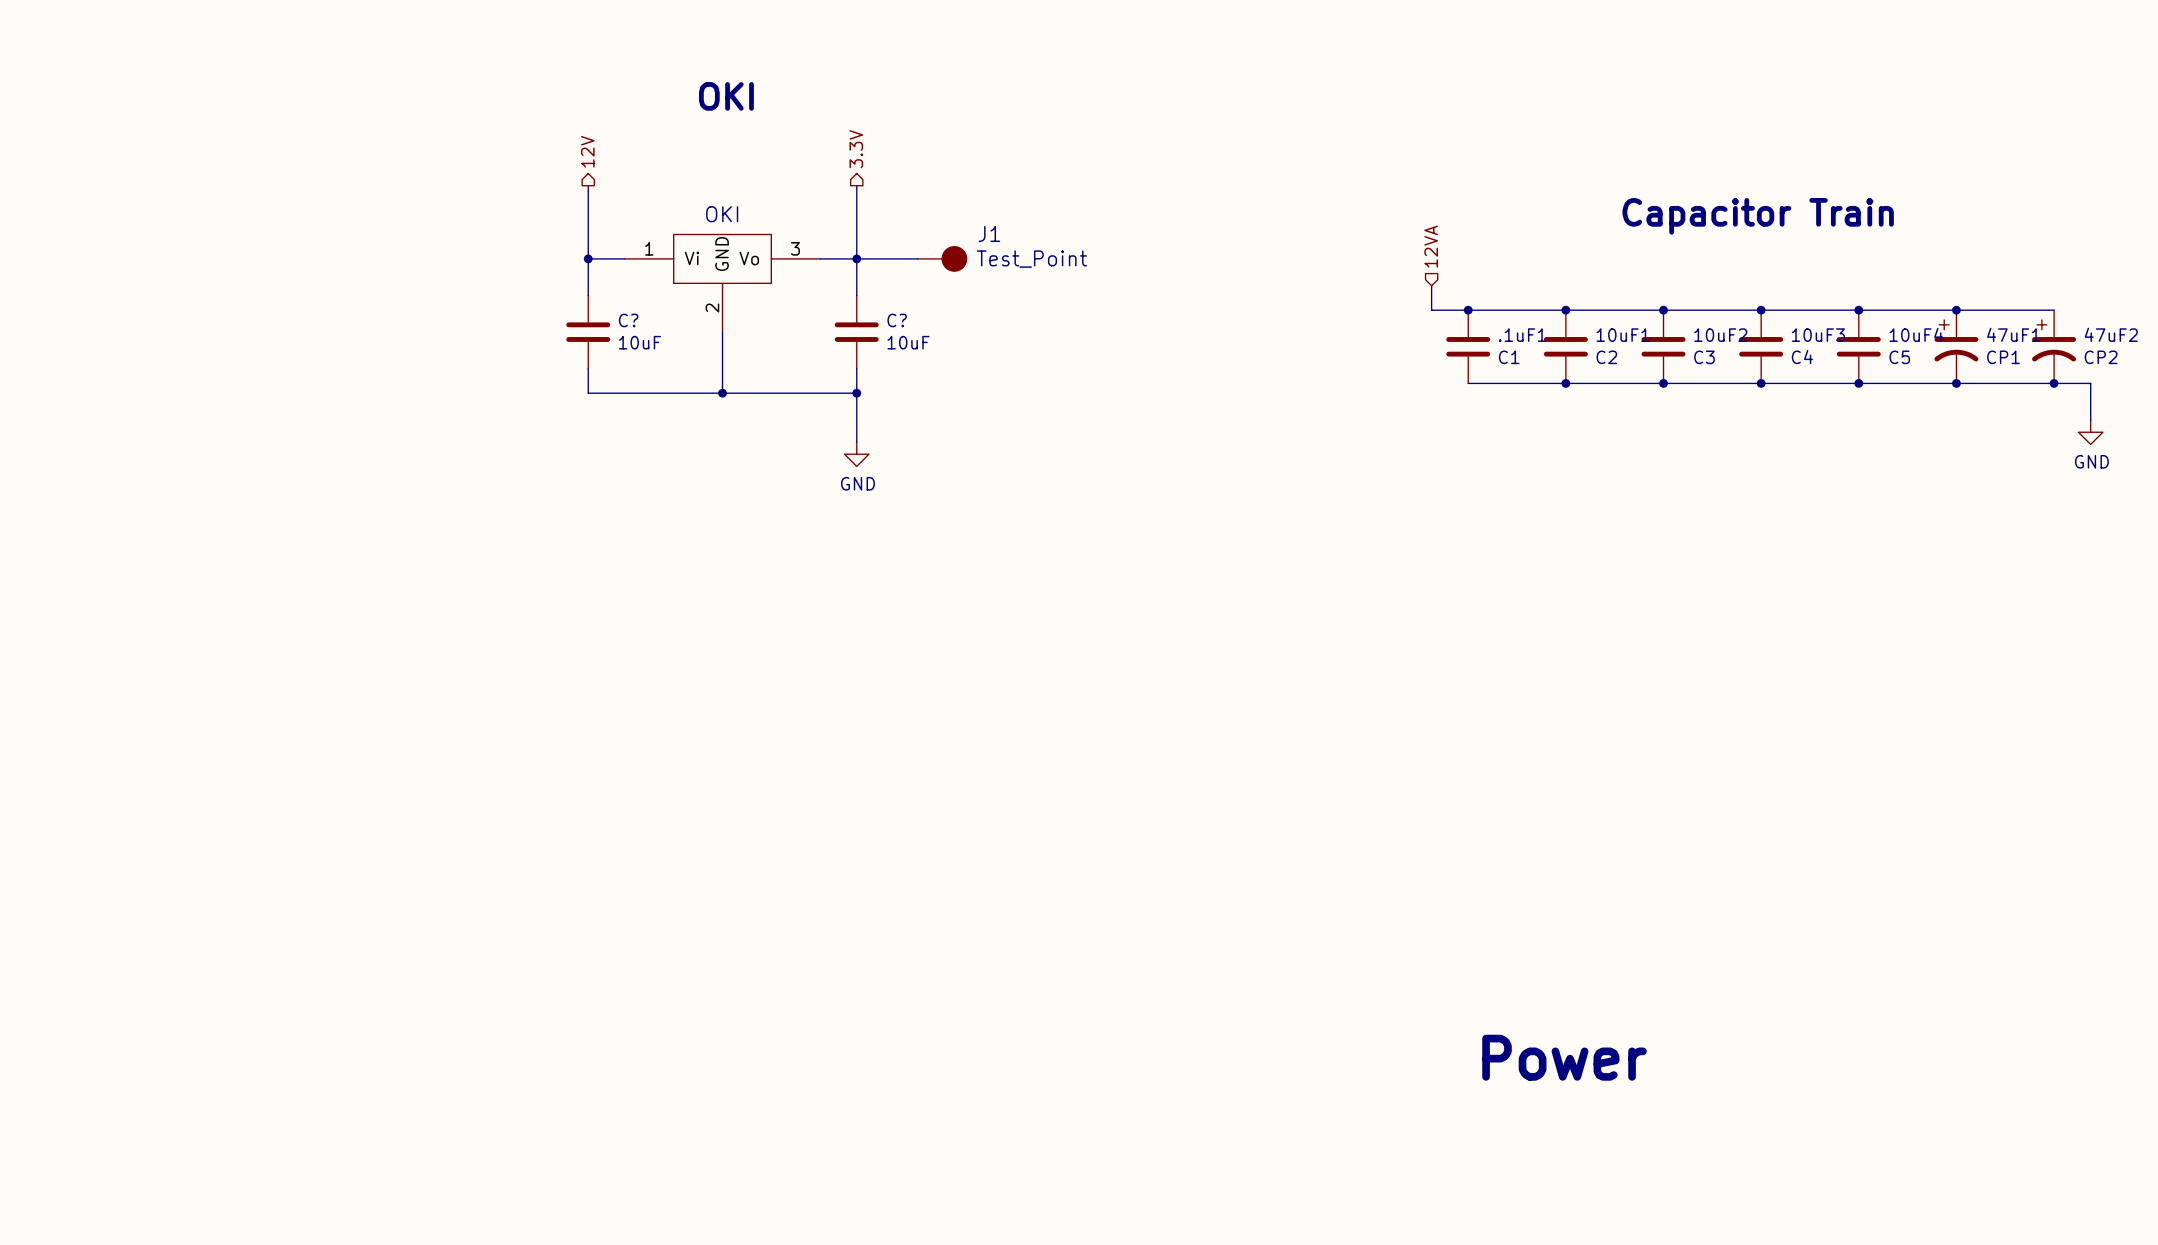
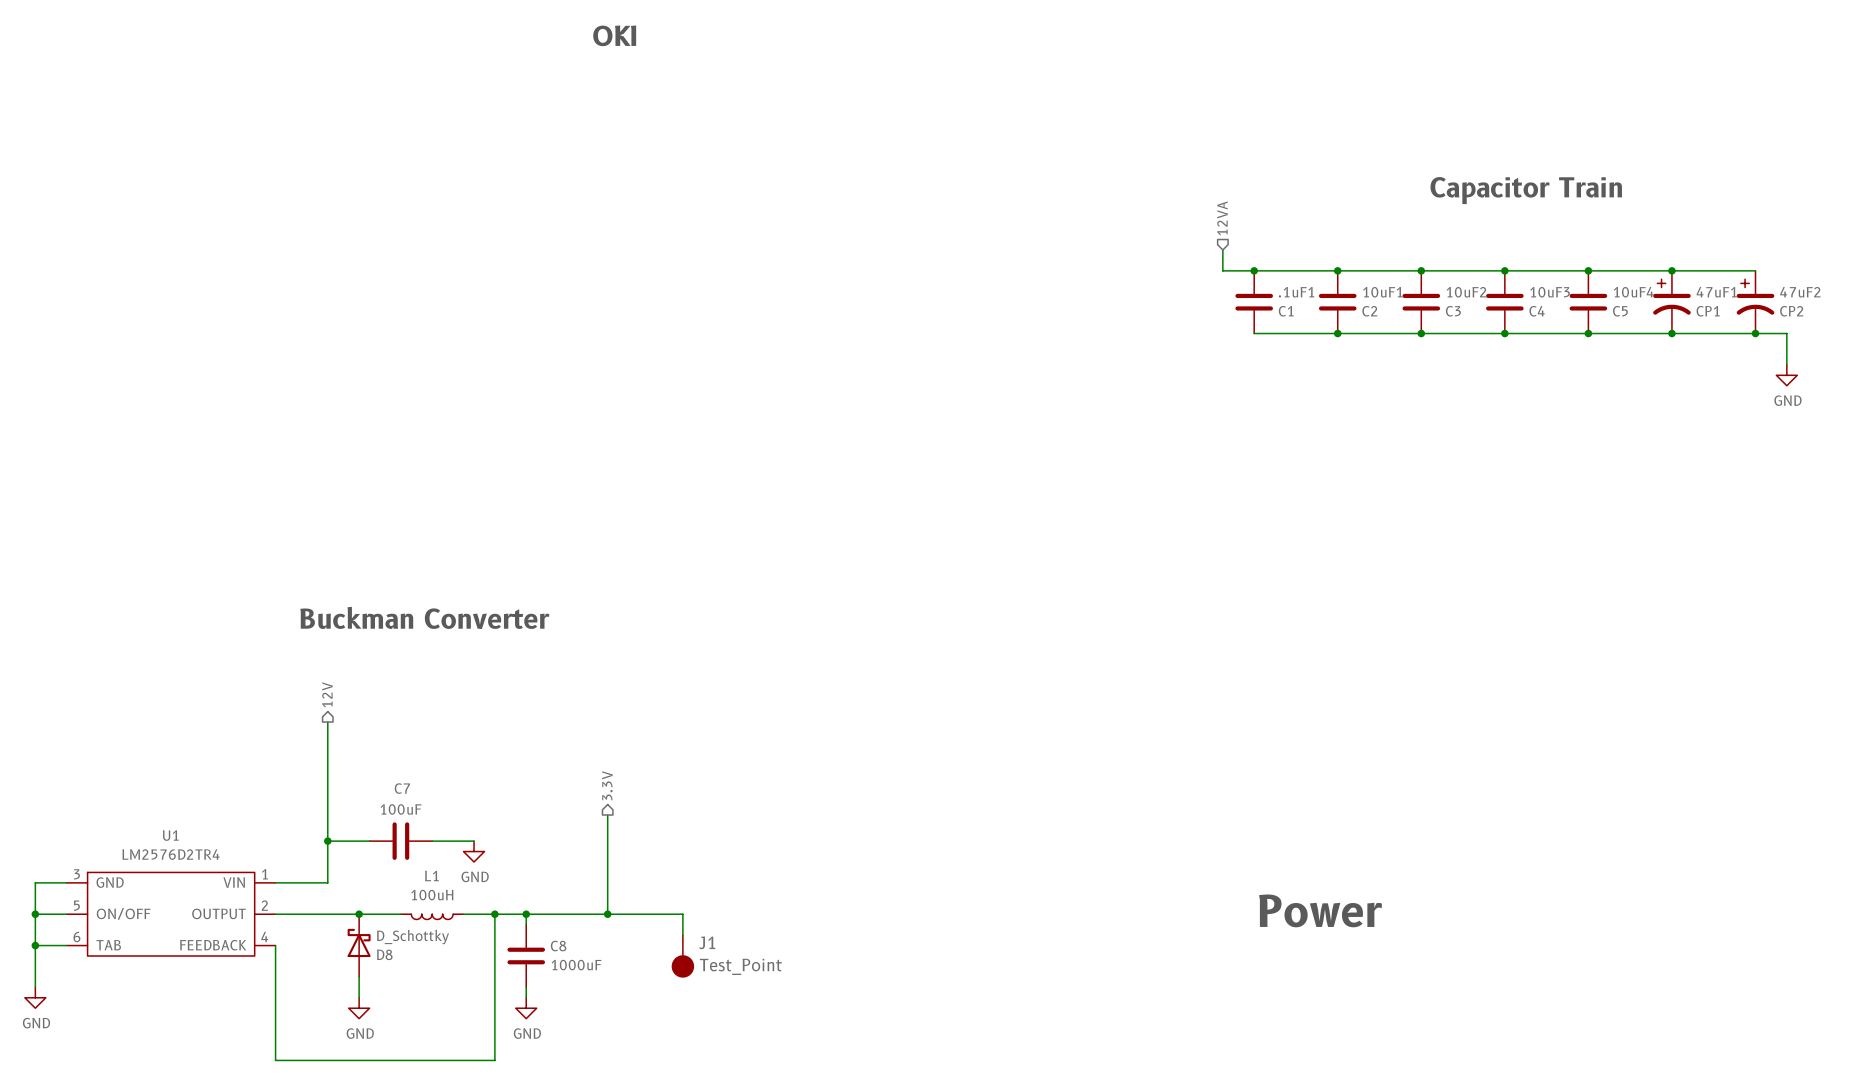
text position: OKI (726, 96) -> OKI (614, 35)
hierarchical label: 3.3V (856, 149) -> none
hierarchical label: 12V (587, 151) -> none
wire: (588, 185) (588, 295) -> none
wire: (856, 185) (856, 295) -> none
wire: (588, 258) (624, 258) -> none
junction: (588, 258) -> none
wire: (820, 258) (917, 258) -> none
junction: (856, 258) -> none
J1 position: (942, 258) -> (682, 956)
J1 rotation: 0° (954, 258) -> 90° clockwise (682, 966)
part: OKI (722, 283) -> none
C?: 10uF (588, 332) -> none
wire: (722, 332) (722, 393) -> none
C?: 10uF (856, 332) -> none
wire: (588, 368) (588, 393) (856, 393) -> none
wire: (856, 368) (856, 442) -> none
junction: (722, 393) -> none
junction: (856, 393) -> none
power symbol: GND (856, 454) -> none
text: none -> Buckman Converter (424, 617)
hierarchical label: none -> 12V (327, 694)
wire: none -> (327, 722) (327, 882) (275, 882)
hierarchical label: none -> 3.3V (607, 785)
wire: none -> (607, 815) (607, 914)
wire: none -> (327, 841) (369, 841)
junction: none -> (327, 841)
C7: none -> 100uF (400, 841)
wire: none -> (432, 841) (474, 841)
power symbol: none -> GND (474, 851)
wire: none -> (66, 882) (35, 882) (35, 987)
wire: none -> (35, 914) (66, 914)
junction: none -> (35, 914)
U1: none -> LM2576D2TR4 (171, 914)
wire: none -> (275, 914) (400, 914)
junction: none -> (359, 914)
wire: none -> (463, 914) (682, 914) (682, 935)
wire: none -> (494, 914) (494, 1060) (275, 1060) (275, 945)
junction: none -> (494, 914)
wire: none -> (526, 914) (526, 924)
junction: none -> (526, 914)
junction: none -> (607, 914)
L1: none -> 100uH (432, 916)
wire: none -> (35, 945) (66, 945)
junction: none -> (35, 945)
D8: none -> D_Schottky (359, 945)
C8: none -> 1000uF (526, 956)
wire: none -> (359, 976) (359, 997)
wire: none -> (526, 987) (526, 997)
power symbol: none -> GND (35, 997)
power symbol: none -> GND (359, 1008)
power symbol: none -> GND (526, 1008)

